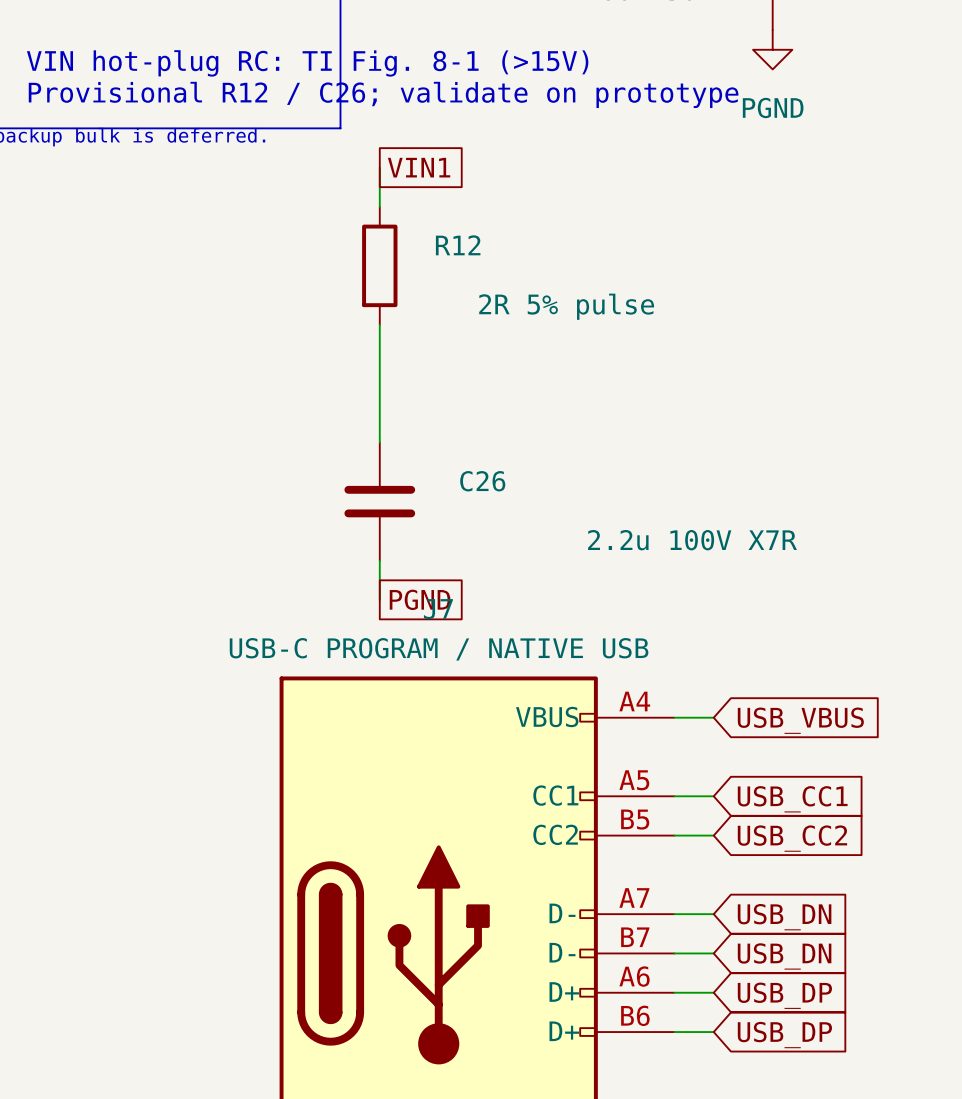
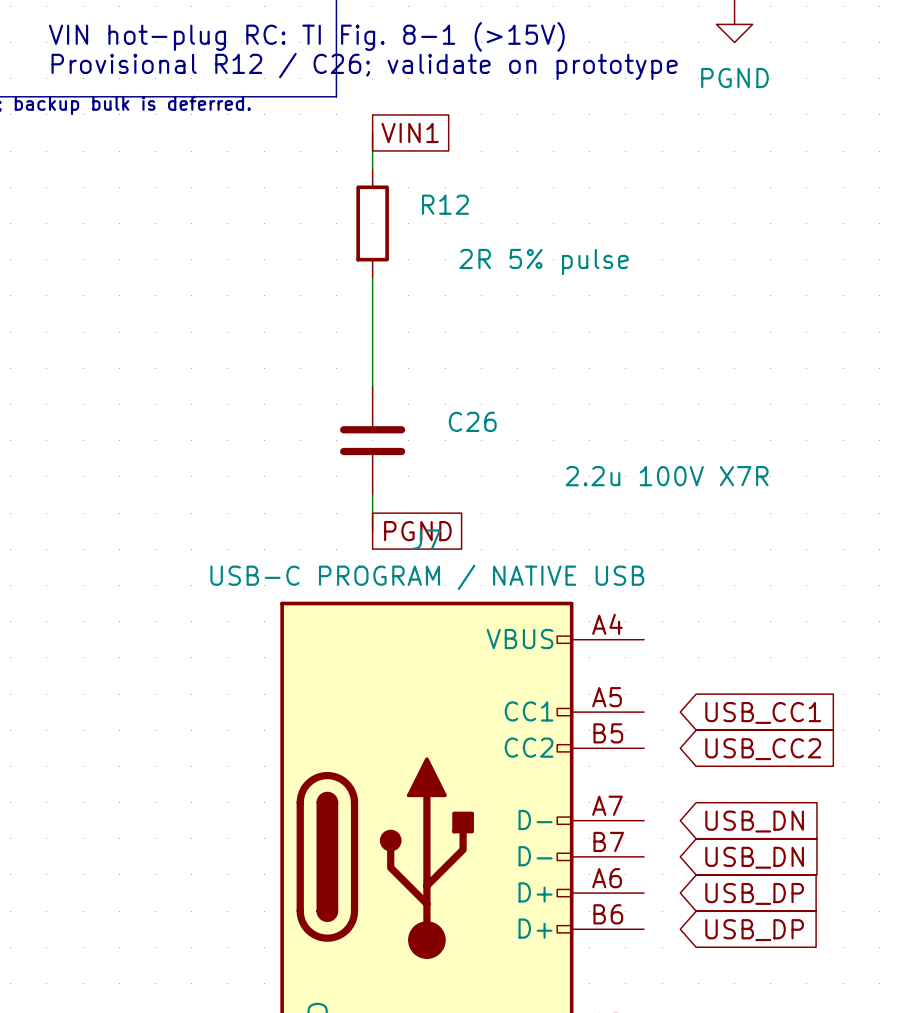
wire: (674, 717) (713, 717) -> none
global label: USB_VBUS (800, 720) -> none
wire: (674, 796) (713, 796) -> none
wire: (674, 835) (713, 835) -> none
wire: (674, 914) (713, 914) -> none
wire: (674, 953) (713, 953) -> none
wire: (674, 992) (713, 992) -> none
wire: (674, 1032) (713, 1032) -> none

